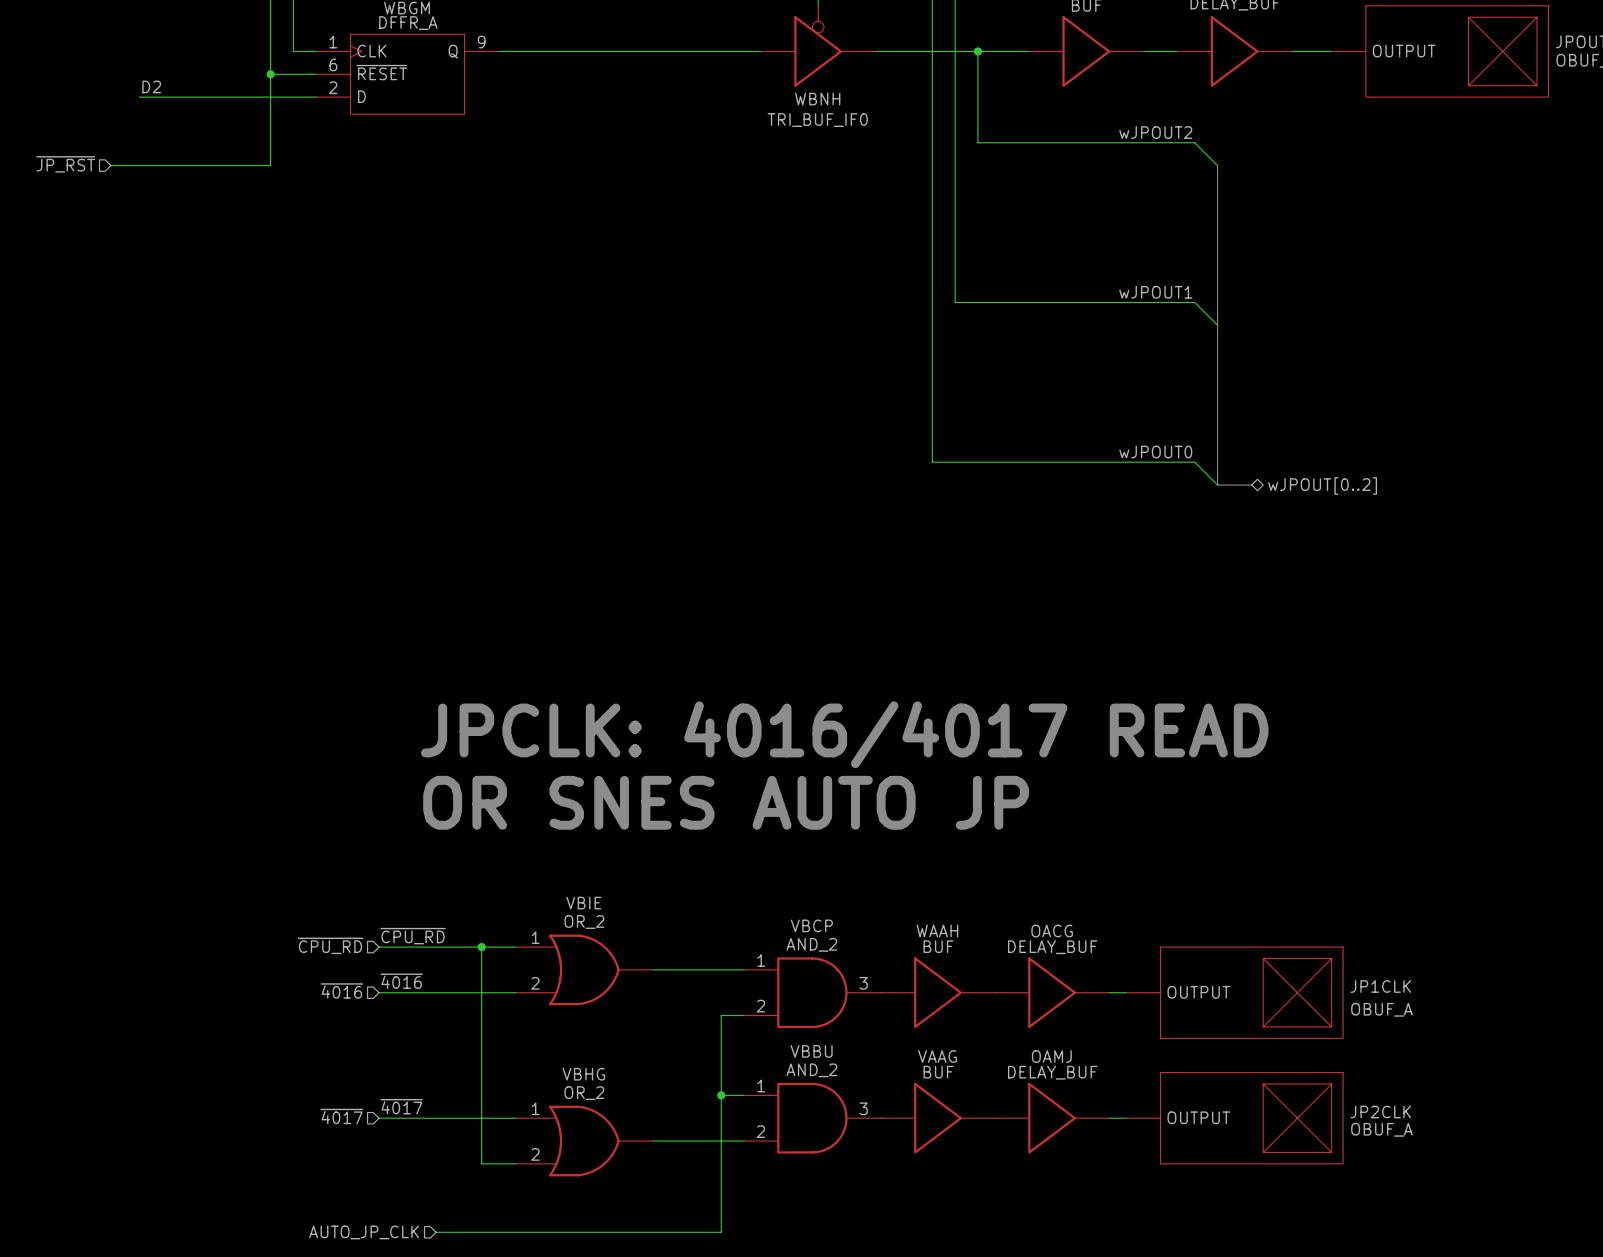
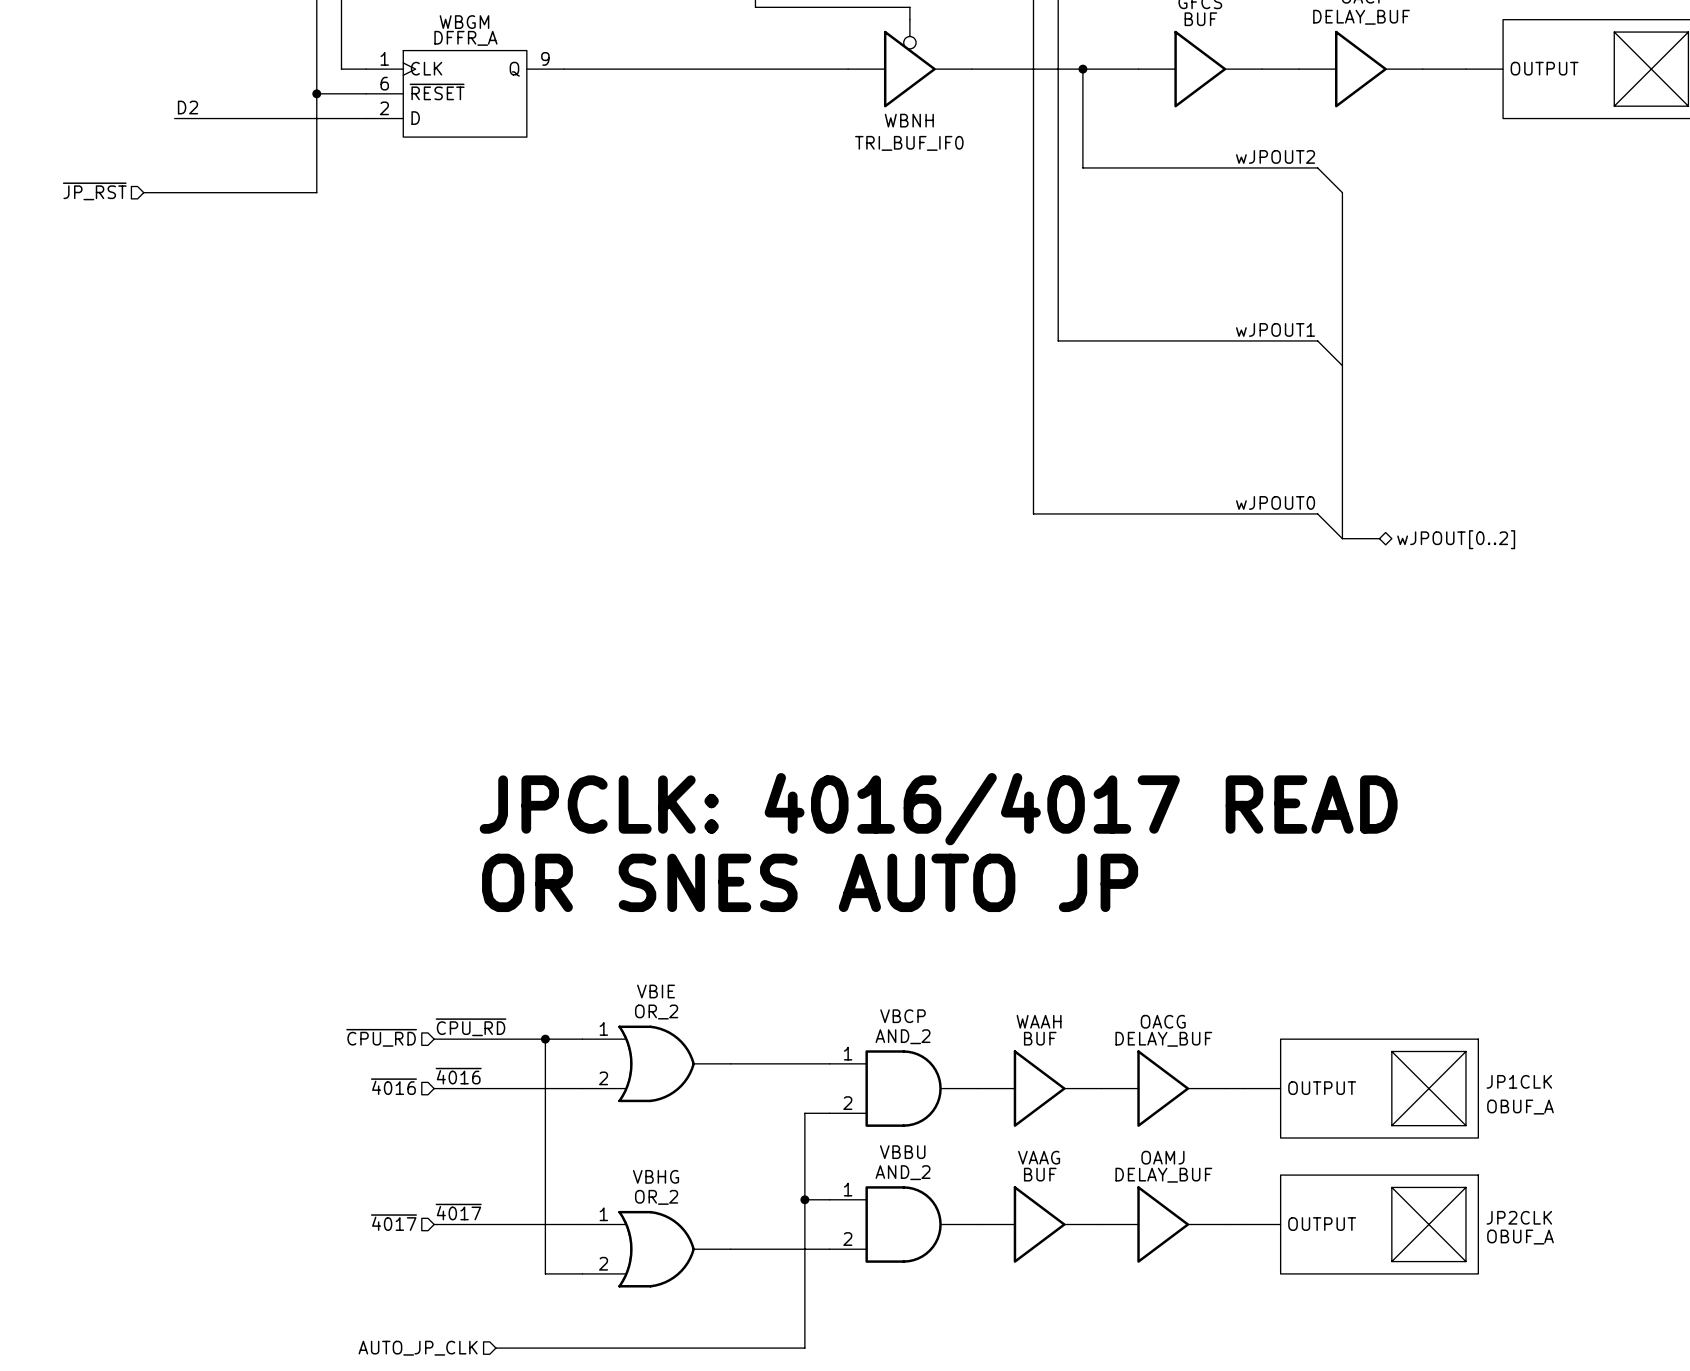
VBCP pin number: 3 (863, 983) -> none
VBBU pin number: 3 (863, 1108) -> none

